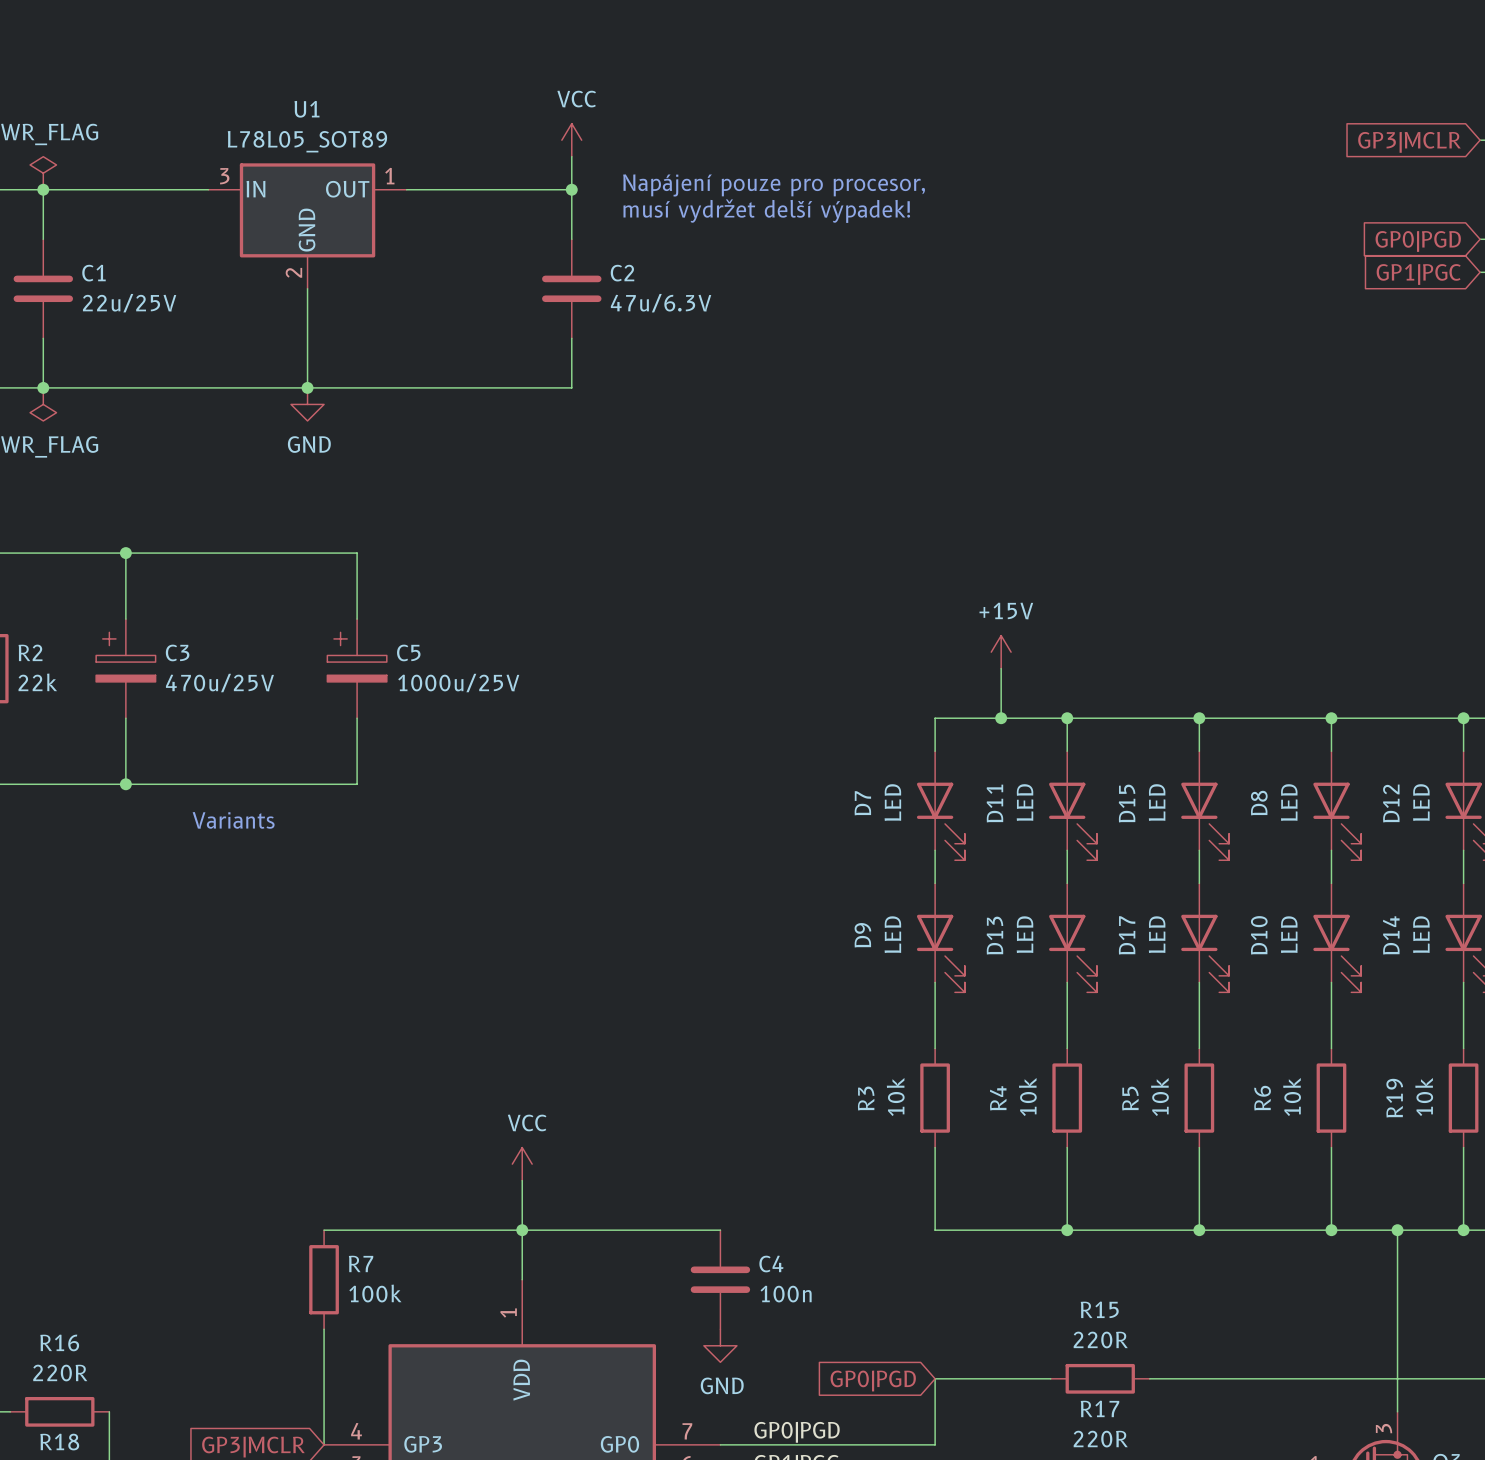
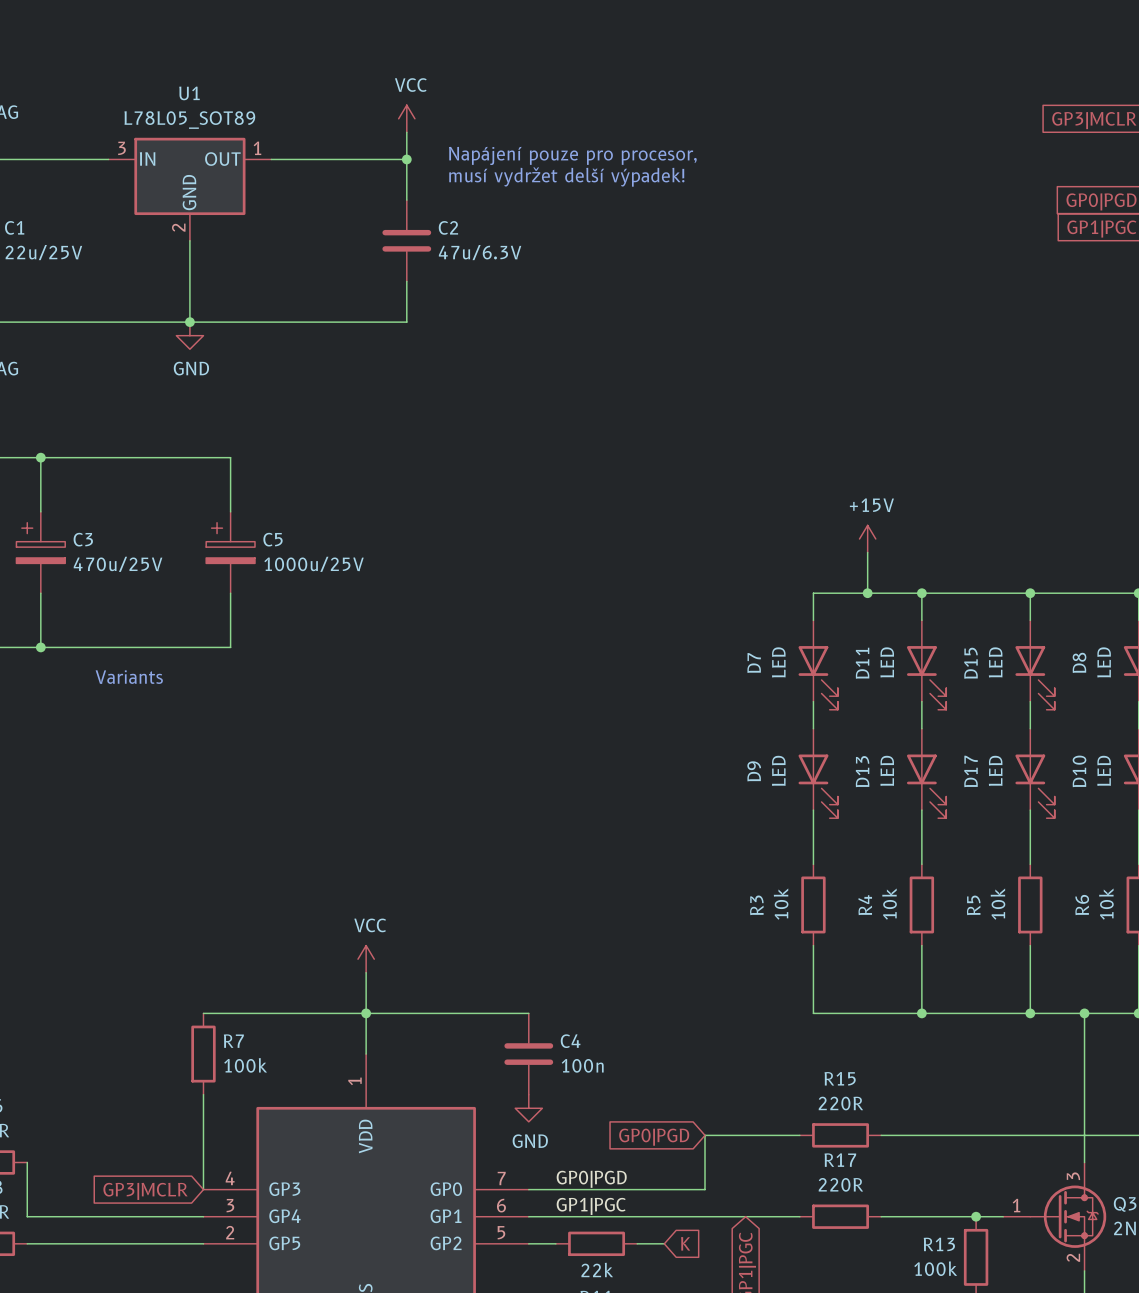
power symbol position: +15V (1001, 652) -> +15V (867, 538)
wire: (1001, 668) (1001, 718) -> (867, 552) (867, 593)
junction: (1001, 718) -> none
wire: (1067, 718) (935, 718) (935, 751) -> none
junction: (1067, 718) -> none
junction: none -> (867, 593)
D11 name: D11 (994, 803) -> D7 (754, 663)
D15 name: D15 (1127, 803) -> D11 (862, 663)
D8 name: D8 (1259, 803) -> D15 (970, 663)
D12 name: D12 (1391, 803) -> D8 (1079, 662)
D7: LED (940, 805) -> none
wire: (935, 850) (935, 883) -> none
D13 name: D13 (994, 935) -> D9 (754, 771)
D17 name: D17 (1127, 935) -> D13 (862, 771)
D10 name: D10 (1259, 935) -> D17 (970, 771)
D14 name: D14 (1391, 935) -> D10 (1079, 771)
D9: LED (940, 937) -> none
wire: (935, 982) (935, 1048) -> none
R3: 10k (935, 1098) -> none
R4 name: R4 (998, 1098) -> R3 (756, 905)
R5 name: R5 (1130, 1098) -> R4 (865, 905)
R6 name: R6 (1262, 1098) -> R5 (973, 905)
R19 name: R19 (1394, 1098) -> R6 (1082, 905)
wire: (935, 1147) (935, 1230) (1067, 1230) -> none
junction: (1067, 1230) -> none

